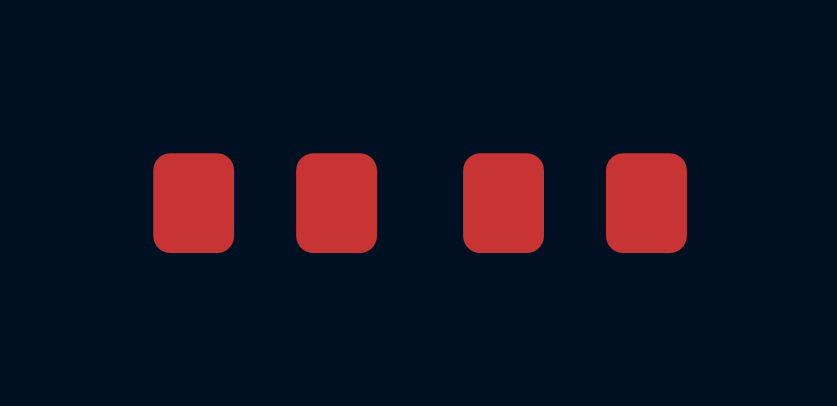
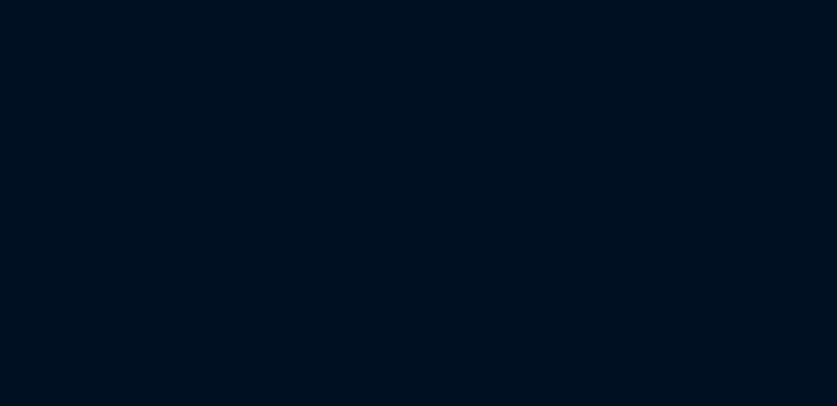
part: (265, 203) -> none
part: (574, 203) -> none

